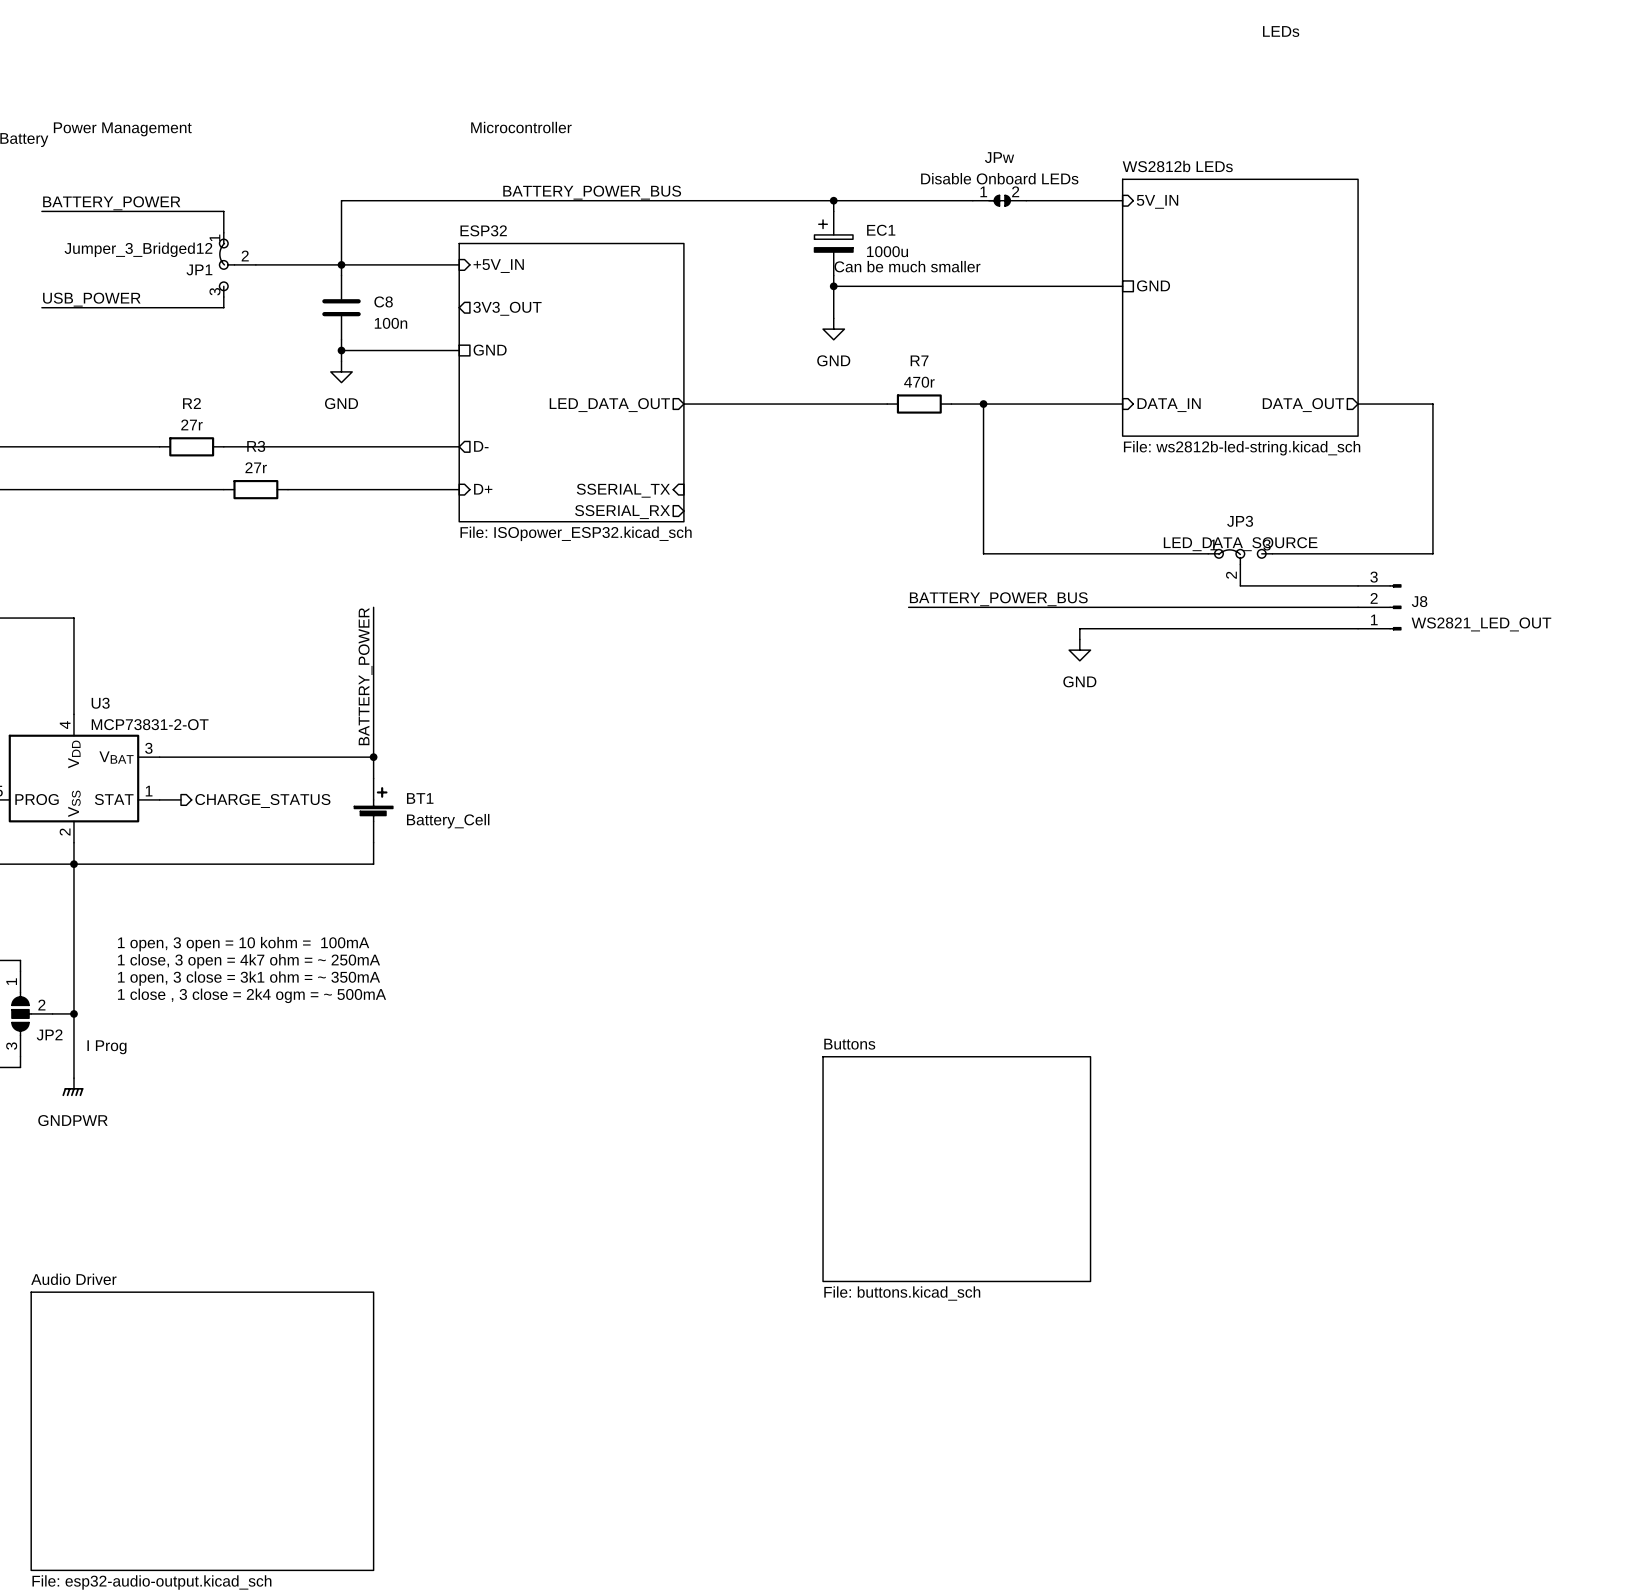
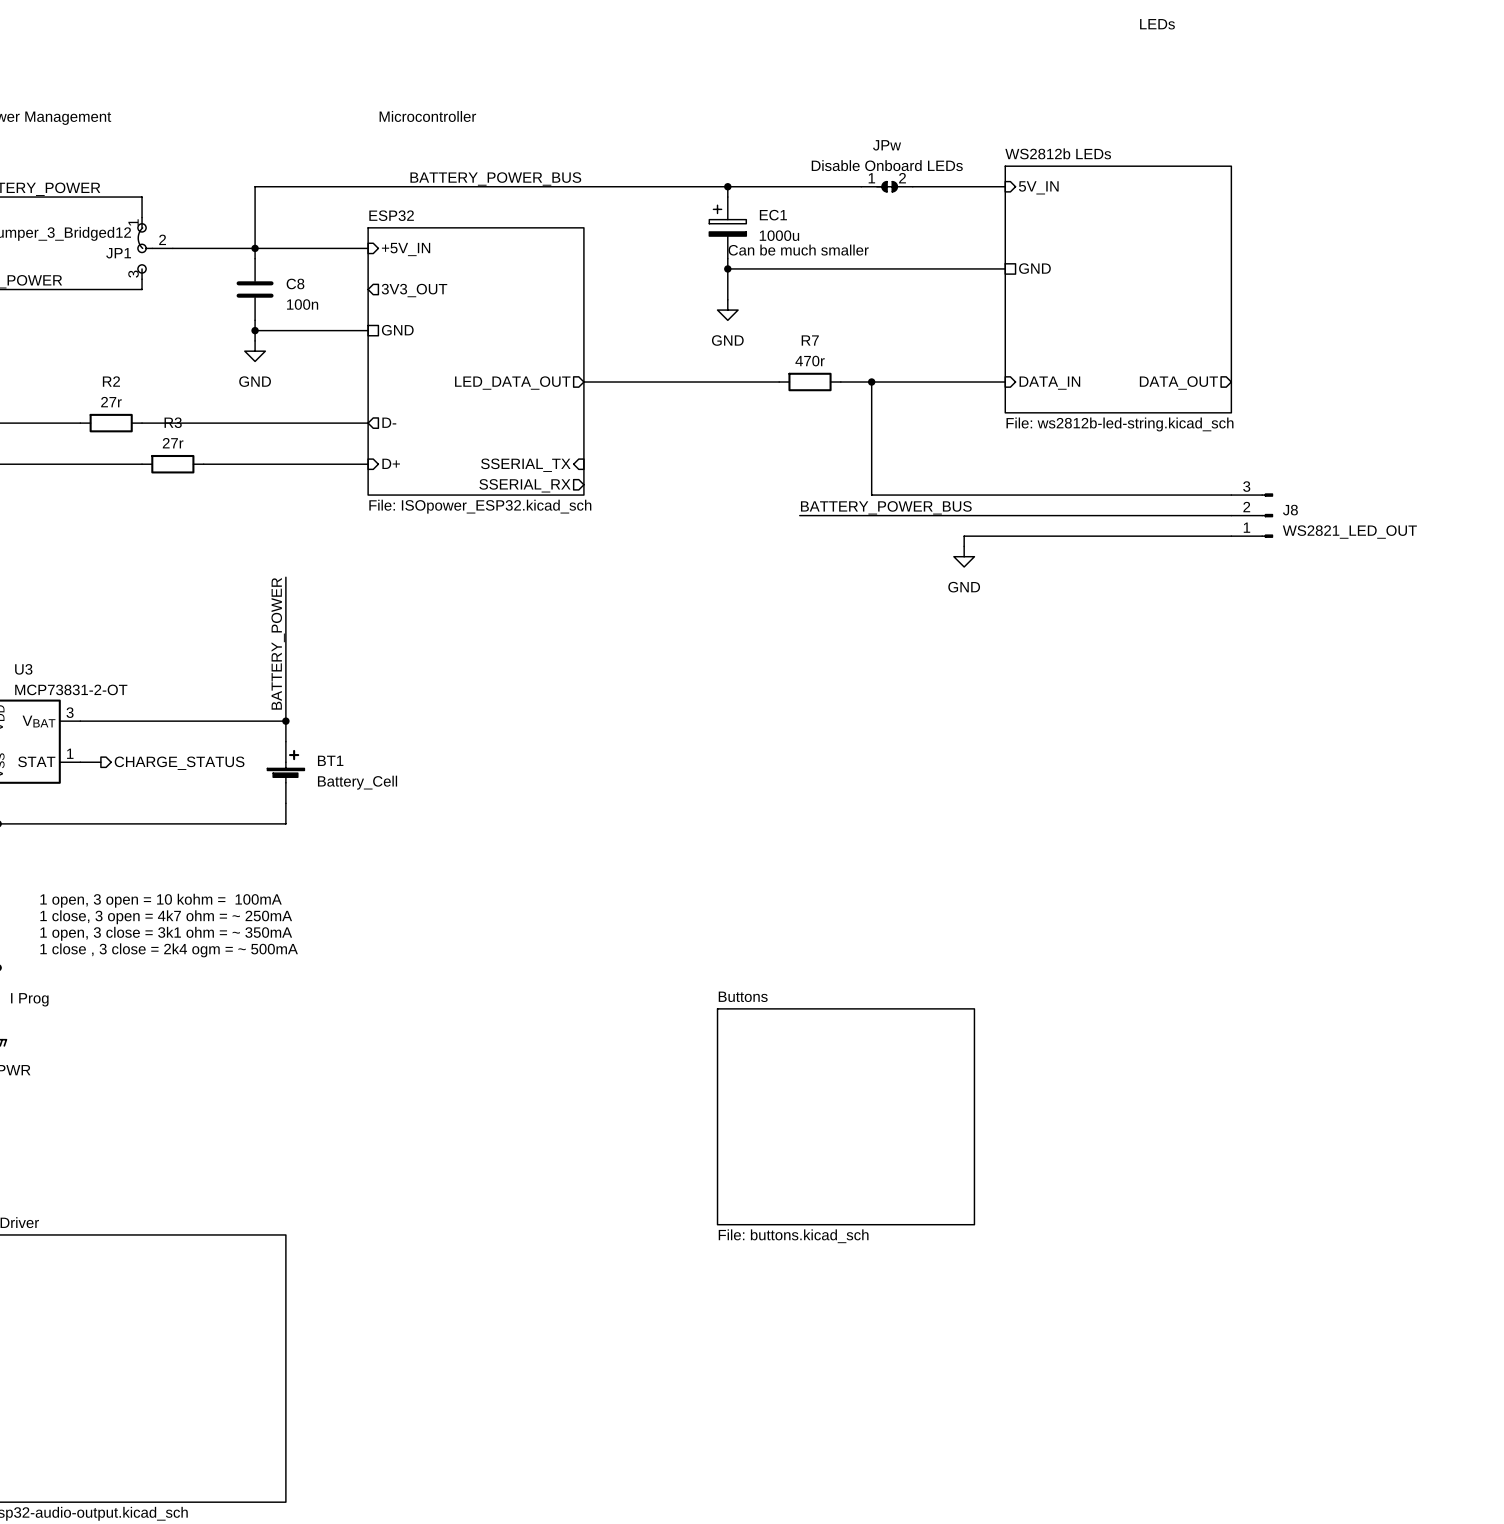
wire: (1358, 404) (1432, 404) (1432, 553) (1272, 553) -> none
wire: (983, 521) (983, 553) (1208, 553) -> (871, 495) (1231, 495)
JP3: LED_DATA_SOURCE (1240, 567) -> none
wire: (1240, 585) (1358, 585) -> none
label position: BATTERY_POWER_BUS (998, 599) -> BATTERY_POWER_BUS (886, 507)
wire: (908, 607) (1358, 607) -> (799, 515) (1231, 515)
J8 position: (1379, 607) -> (1252, 515)
wire: (1358, 628) (1079, 628) (1079, 639) -> (1231, 536) (964, 536) (964, 546)
power symbol position: GND (1079, 650) -> GND (964, 556)

